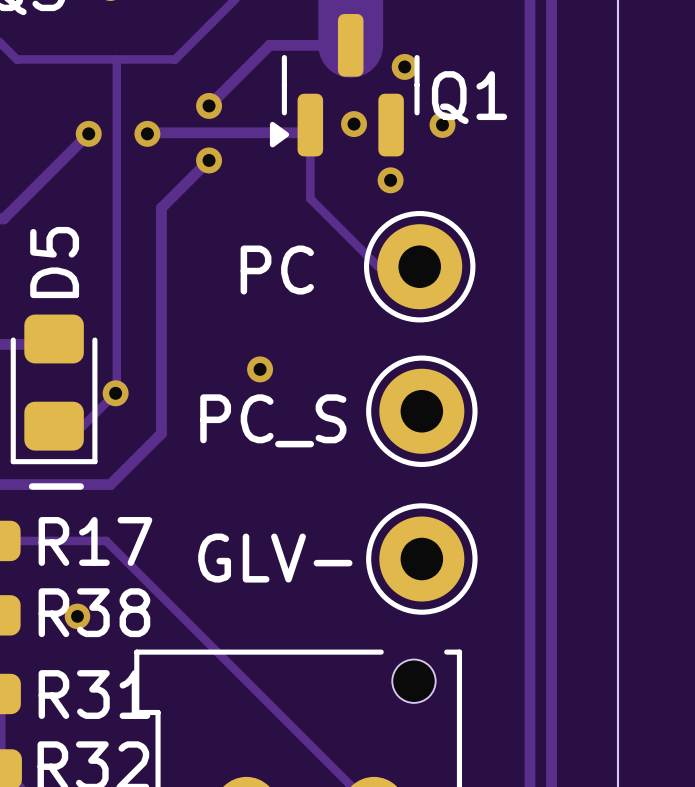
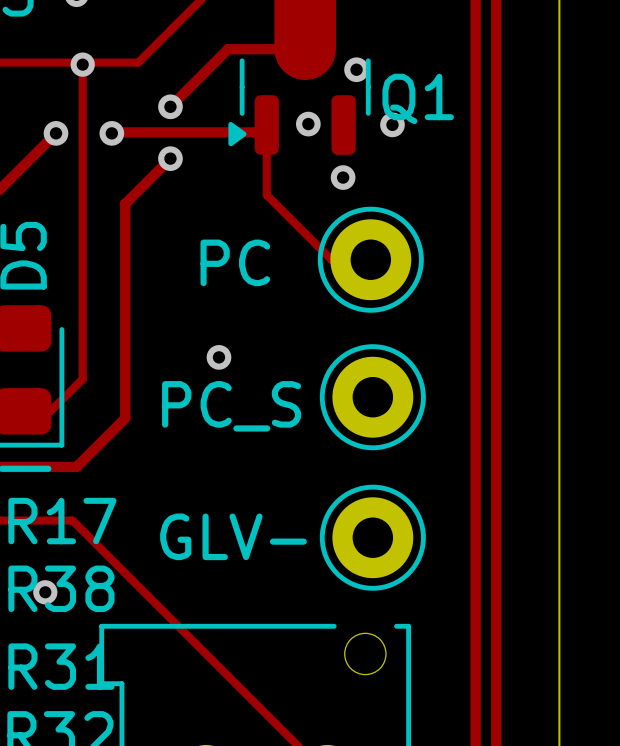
via: none -> (82, 64)
via: (115, 393) -> none

